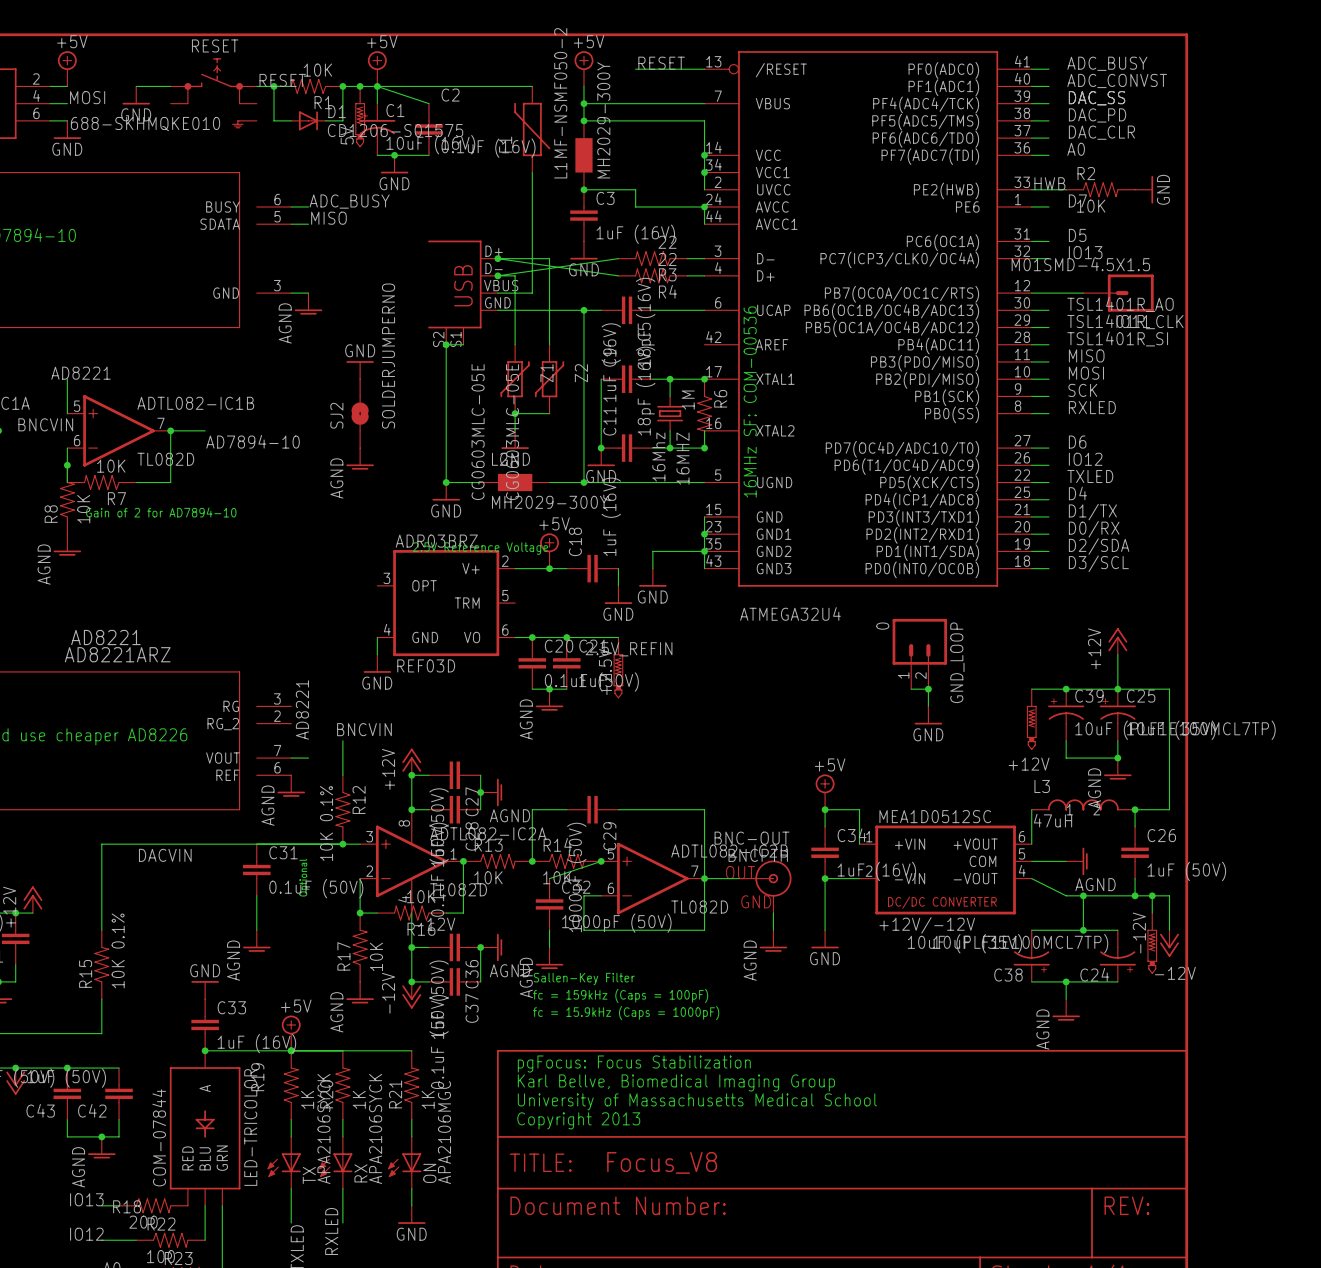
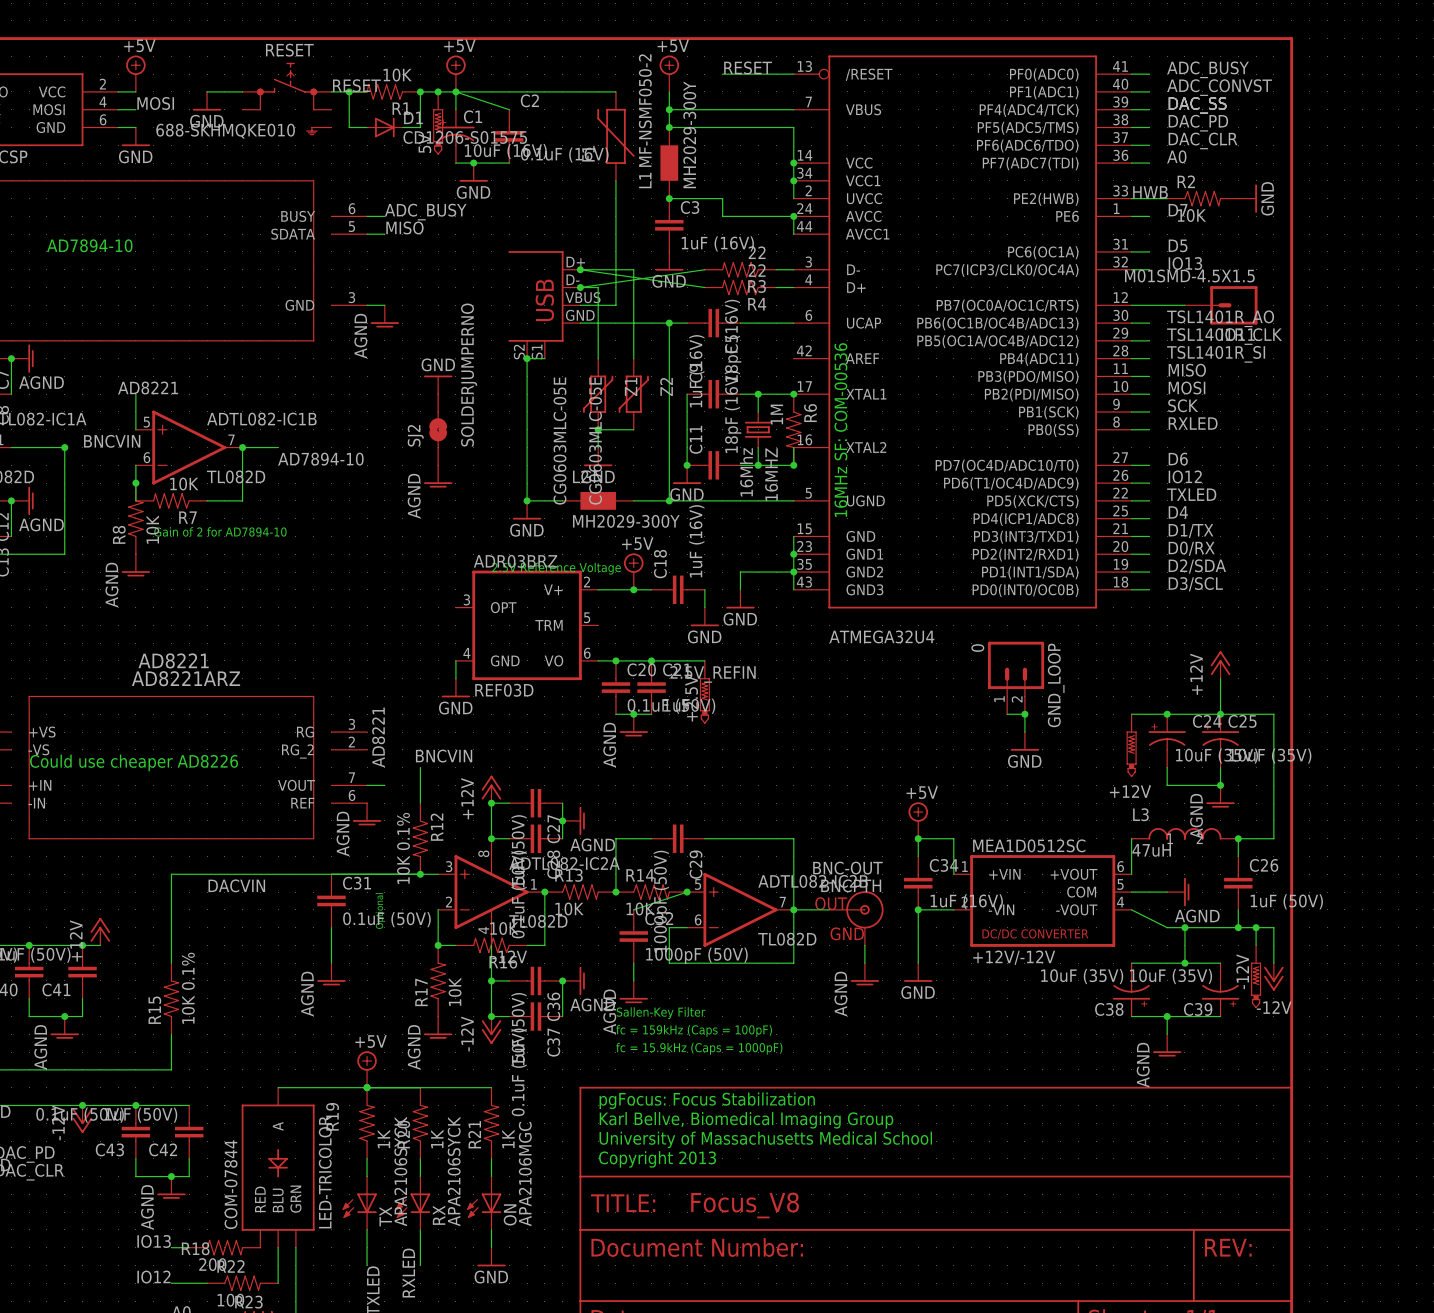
C39 name: C39 (1089, 696) -> C24 (1207, 721)
C39 value: 10uF (PLF1E100MCL7TP) (1175, 730) -> 10uF (35V) (1217, 756)
C24 value: 10uF (PLF1E100MCL7TP) (1008, 943) -> 10uF (35V) (1171, 976)
C24 name: C24 (1094, 974) -> C39 (1198, 1009)
power symbol: GND (205, 990) -> none
C33: 1uF (16V) (205, 1024) -> none
junction: (205, 1050) -> none

